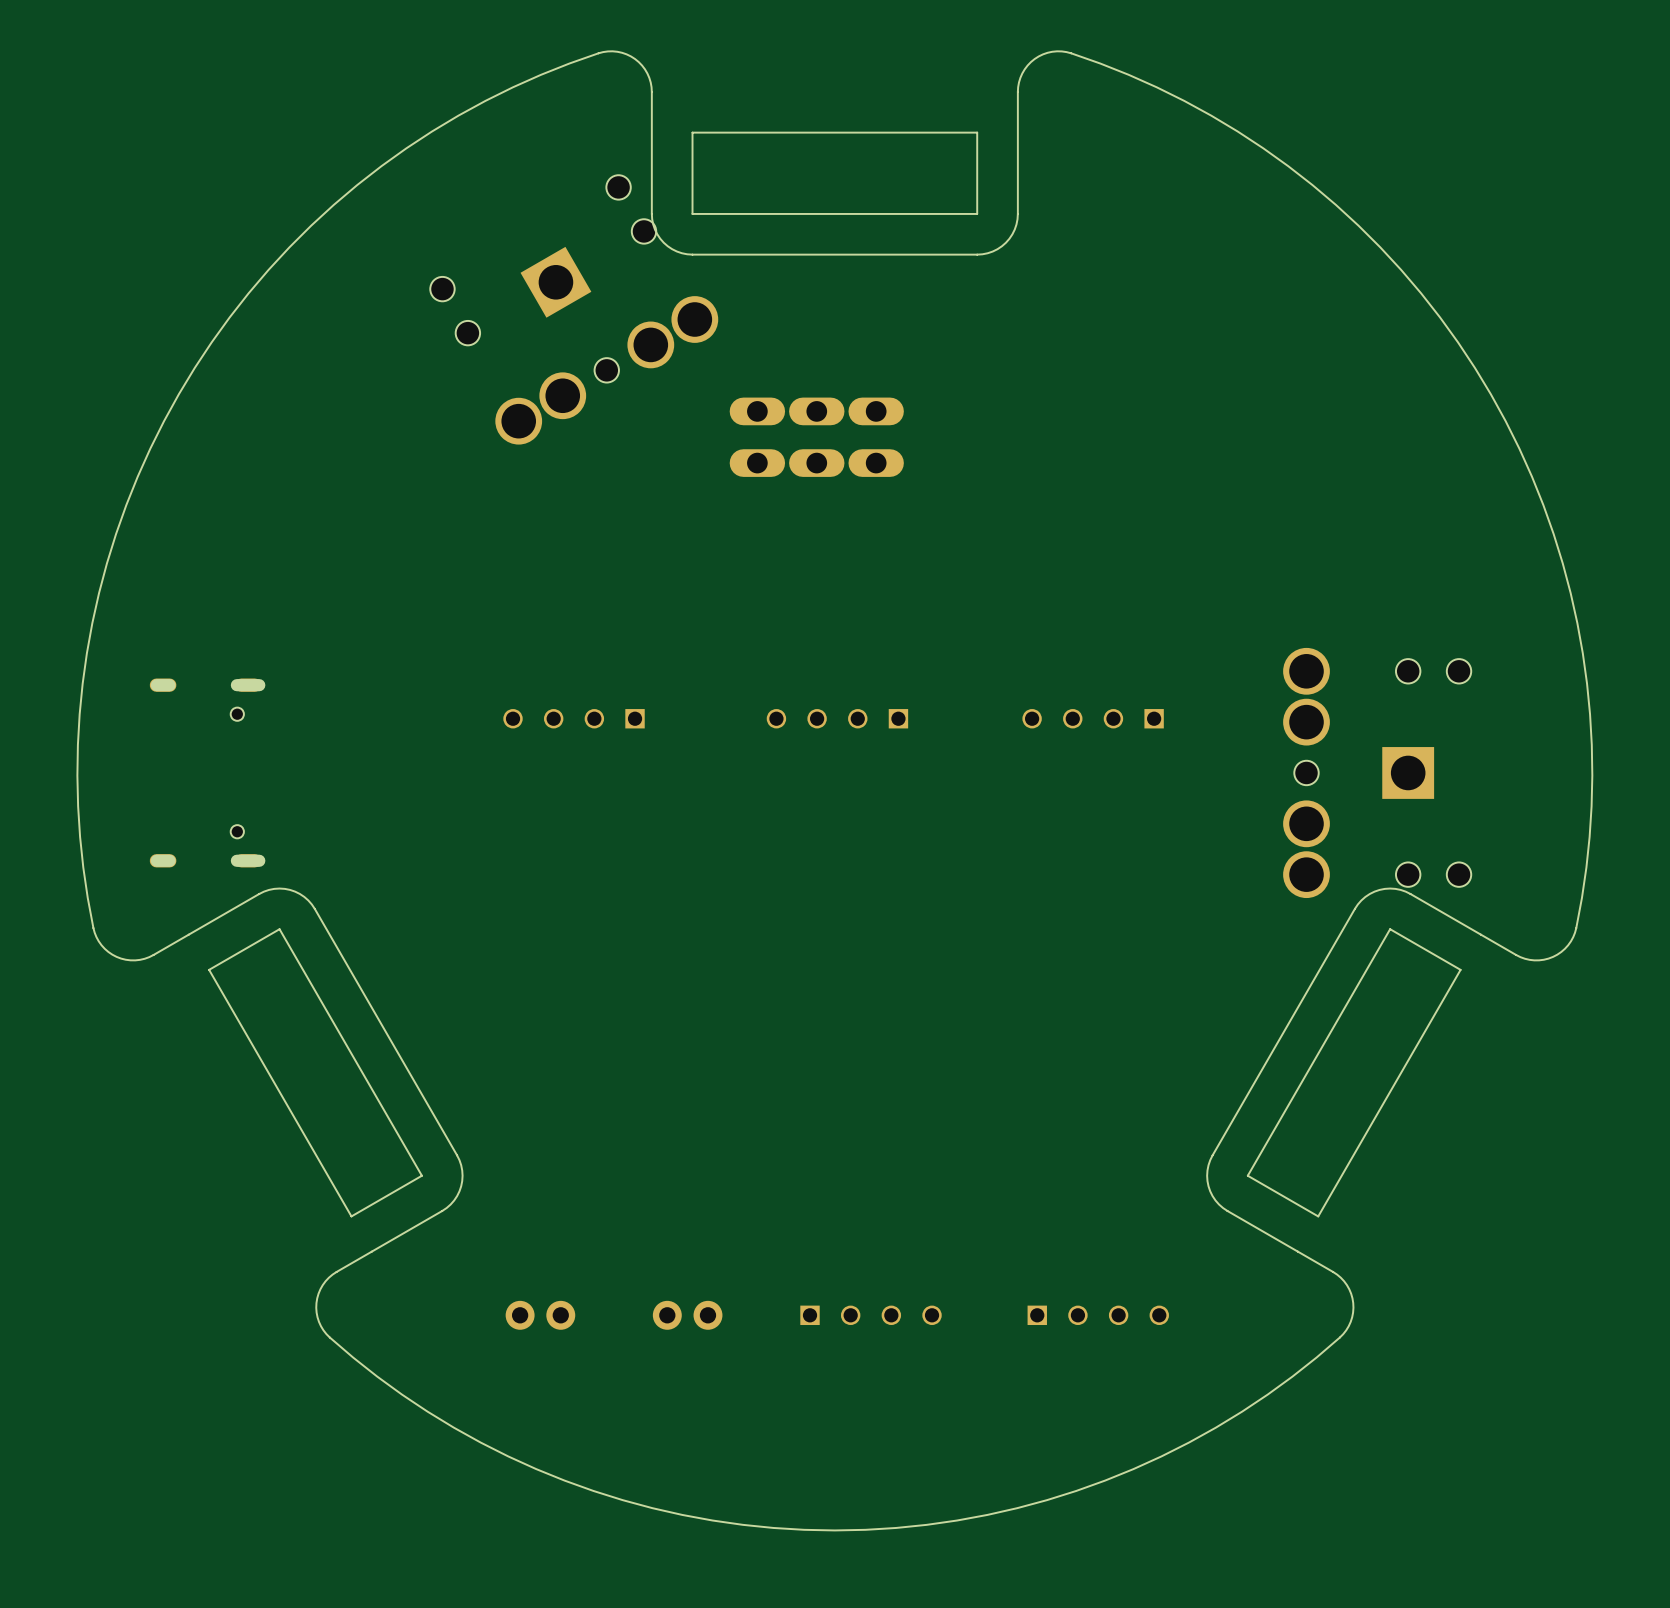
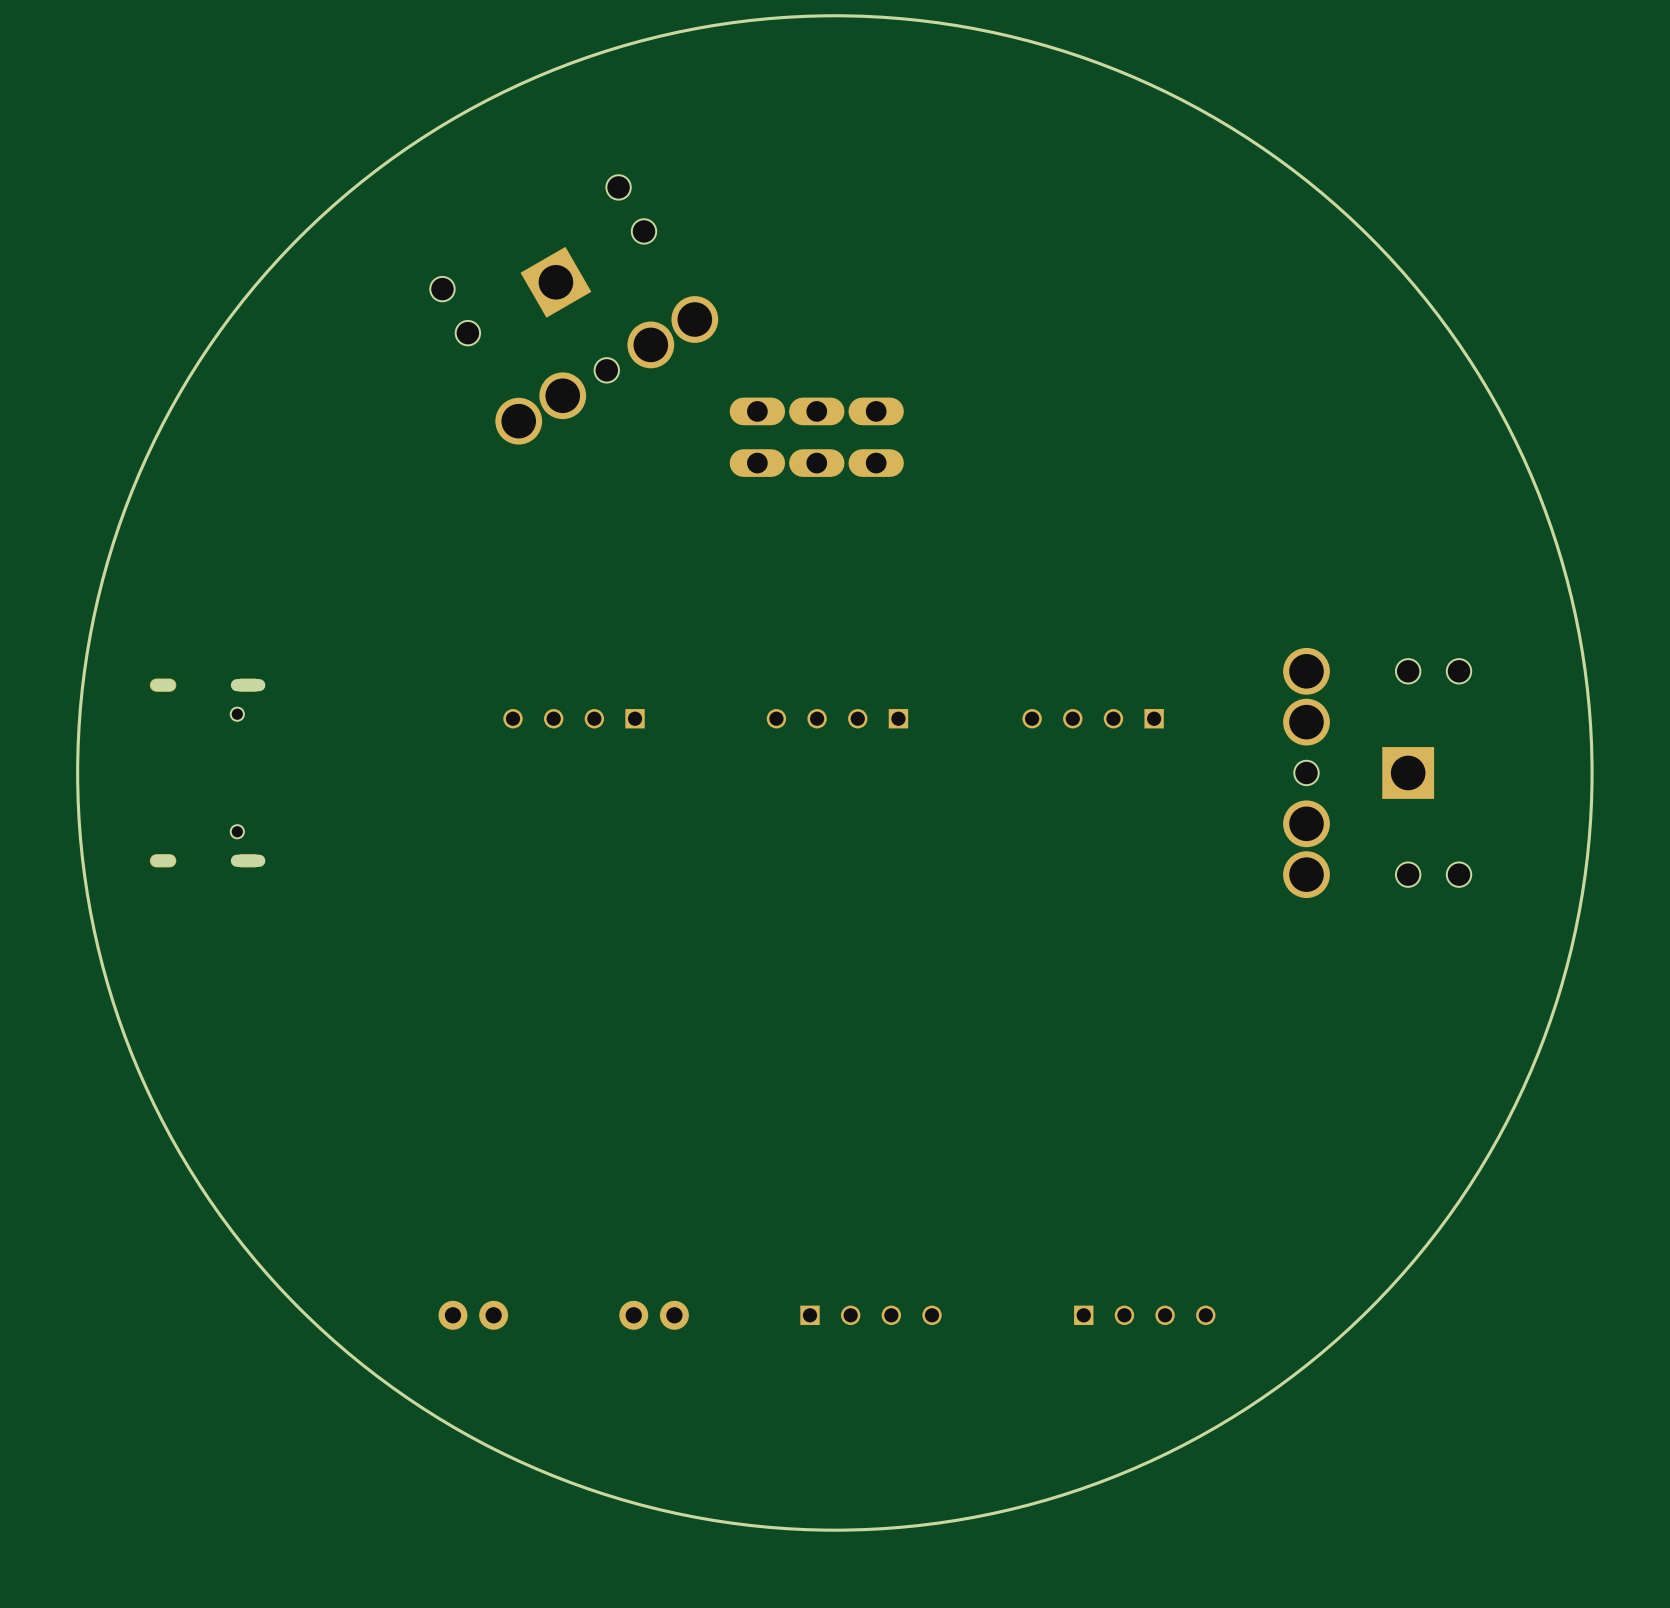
round board edge: none -> [76, 14, 1594, 1532]
board edge: (1071, 53) (1057, 51) (1043, 54) (1030, 62) (1022, 73) (1017, 91) (1016, 224) (1005, 242) (997, 249) (982, 254) (681, 253) (663, 242) (653, 224) (651, 87) (647, 73) (635, 59) (617, 51) (598, 53) (540, 74) (485, 100) (432, 131) (381, 166) (311, 225) (268, 269) (229, 317) (178, 394) (137, 476) (116, 534) (92, 623) (82, 683) (77, 744) (80, 836) (87, 897) (96, 937) (104, 948) (116, 956) (130, 960) (140, 959) (153, 954) (264, 891) (284, 888) (299, 893) (308, 900) (457, 1155) (462, 1175) (457, 1196) (446, 1208) (328, 1277) (320, 1289) (316, 1303) (316, 1312) (320, 1326) (329, 1337) (377, 1376) (453, 1427) (536, 1469) (593, 1490) (682, 1514) (742, 1524) (834, 1530) (926, 1524) (987, 1514) (1076, 1490) (1133, 1469) (1215, 1427) (1267, 1394) (1316, 1357) (1343, 1334) (1352, 1317) (1353, 1303) (1351, 1293) (1340, 1277) (1223, 1208) (1212, 1196) (1207, 1175) (1212, 1155) (1357, 904) (1365, 896) (1379, 889) (1400, 889) (1516, 954) (1529, 959) (1543, 959) (1557, 954) (1568, 945) (1575, 932) (1586, 867) (1591, 806) (1590, 714) (1582, 653) (1562, 563) (1543, 505) (1519, 448) (1490, 394) (1440, 317) (1401, 269) (1358, 225) (1312, 185) (1237, 131) (1184, 100) (1128, 74) (1071, 53) -> none
board edge: (977, 132) (692, 132) (692, 213) (977, 213) (977, 132) -> none
board edge: (279, 929) (421, 1175) (351, 1216) (209, 969) (279, 929) -> none
board edge: (1390, 929) (1247, 1175) (1318, 1216) (1460, 969) (1390, 929) -> none
part: none -> (473, 1315)
part: (540, 1315) -> none
part position: (687, 1315) -> (654, 1315)
part position: (1098, 1315) -> (1144, 1315)

